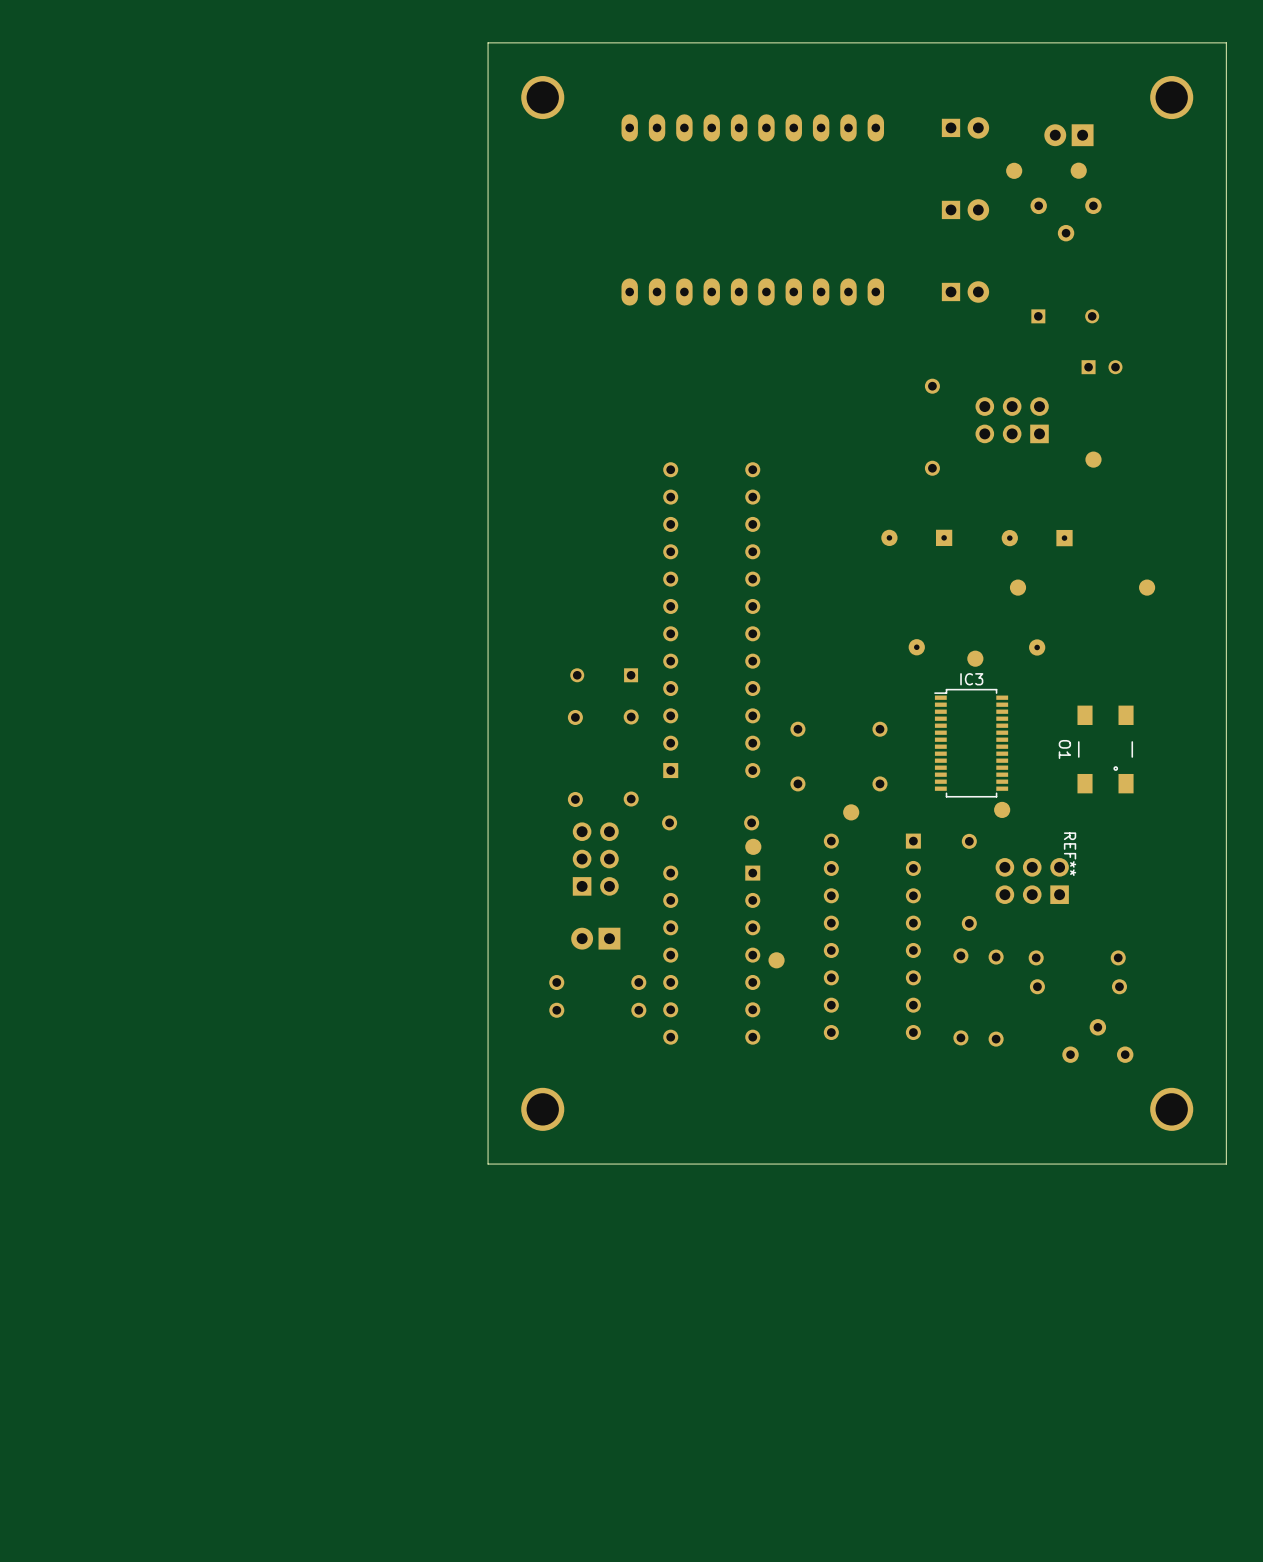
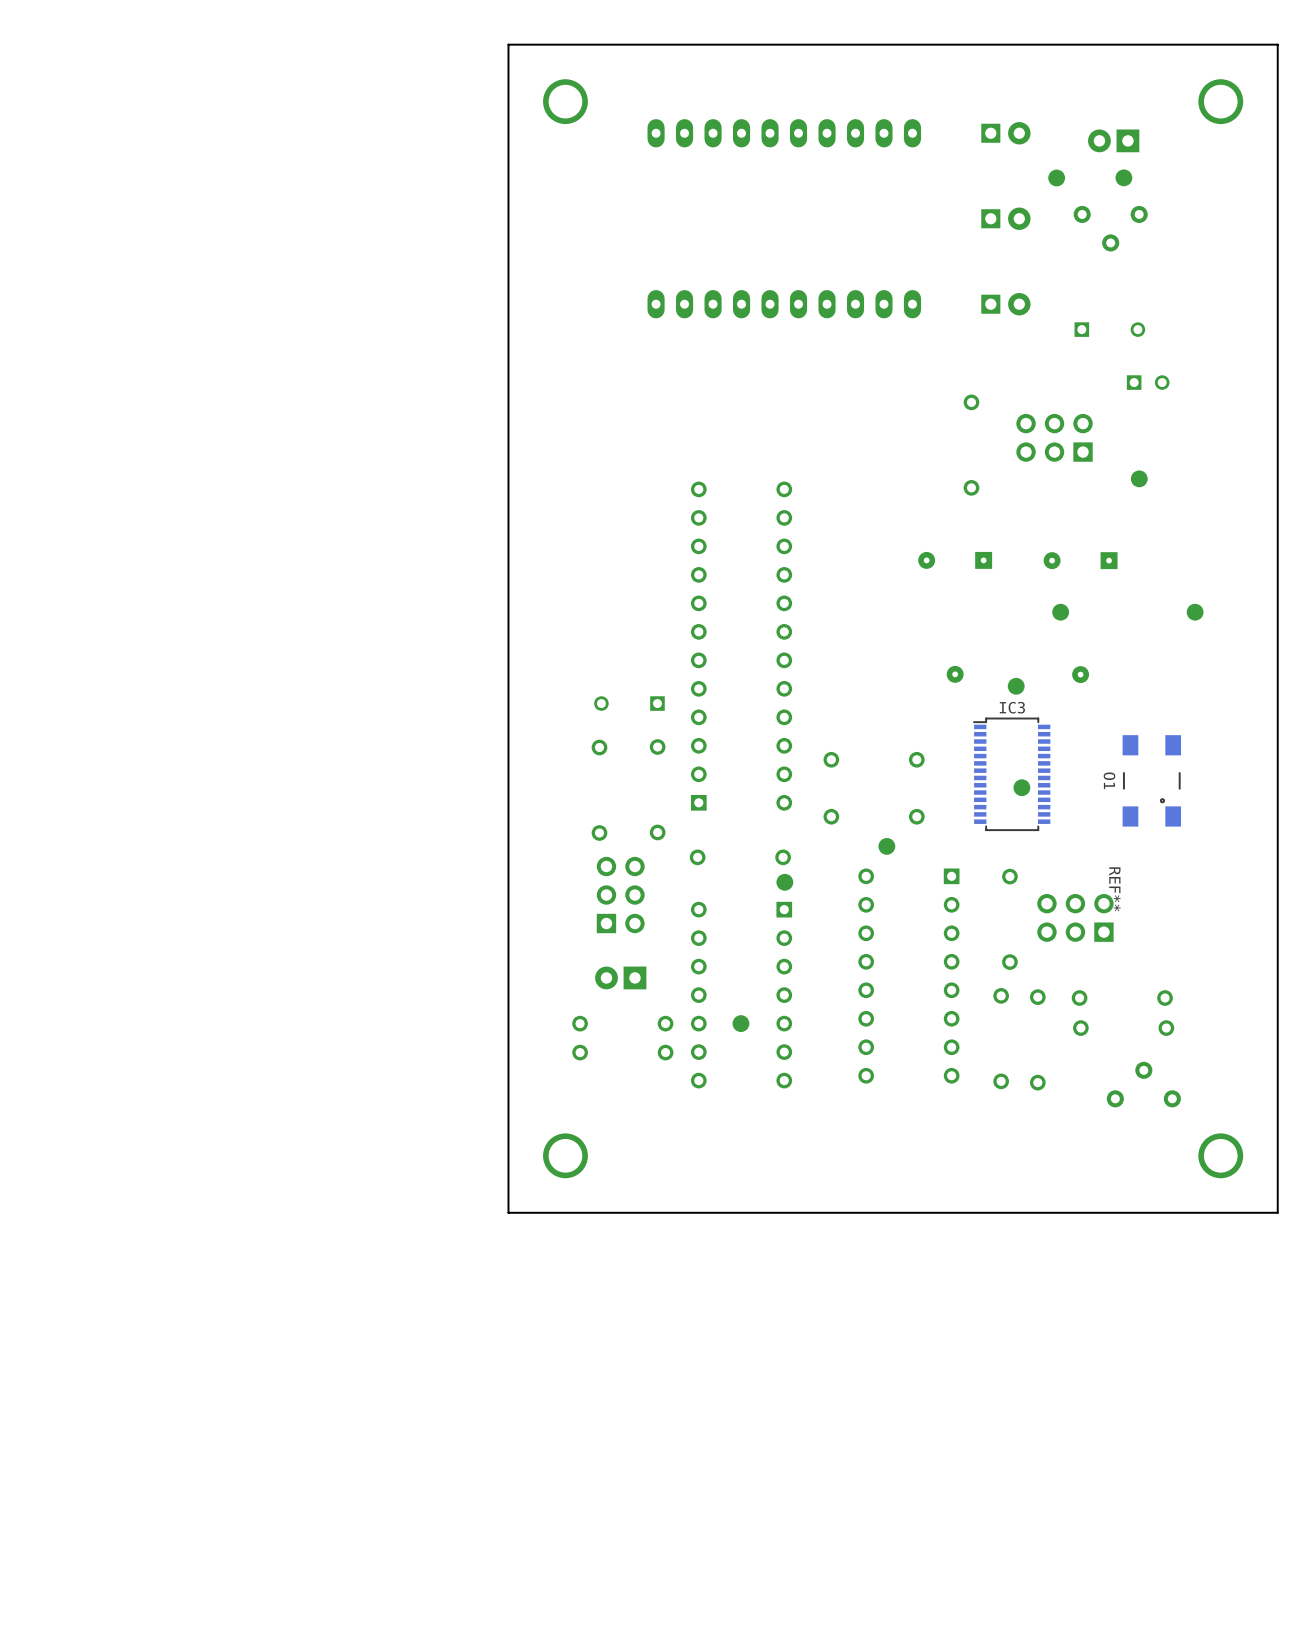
part position: (1002, 809) -> (1021, 787)
part position: (776, 960) -> (740, 1023)

